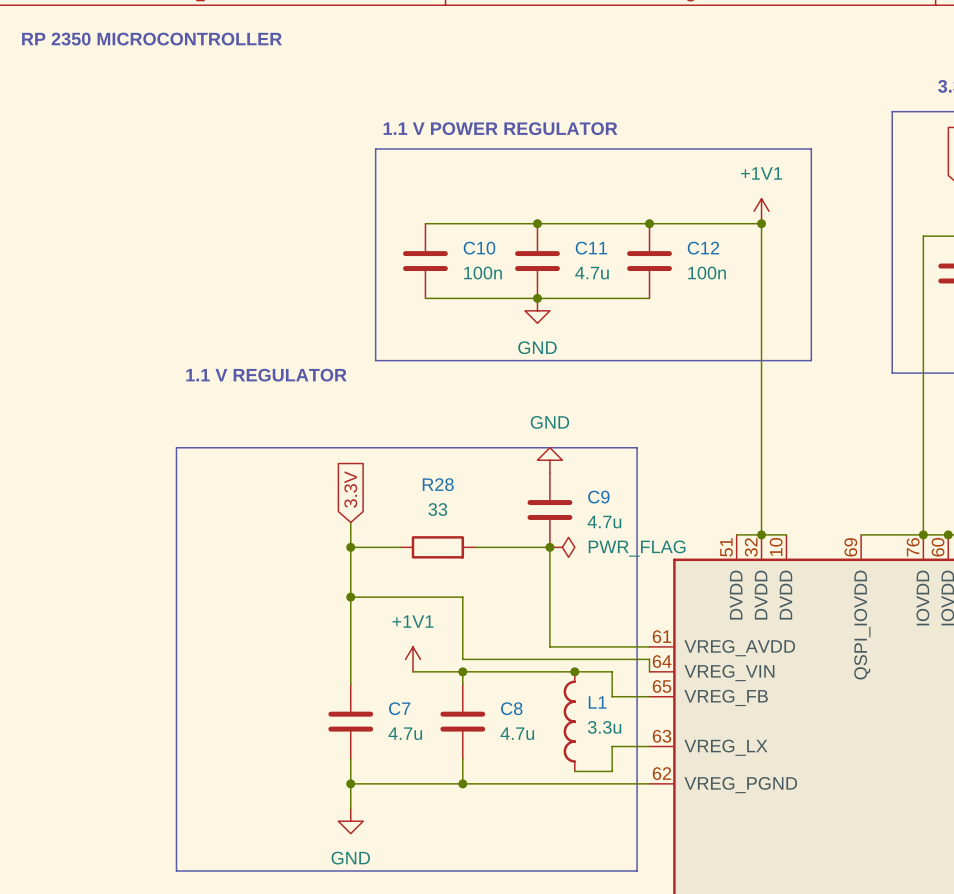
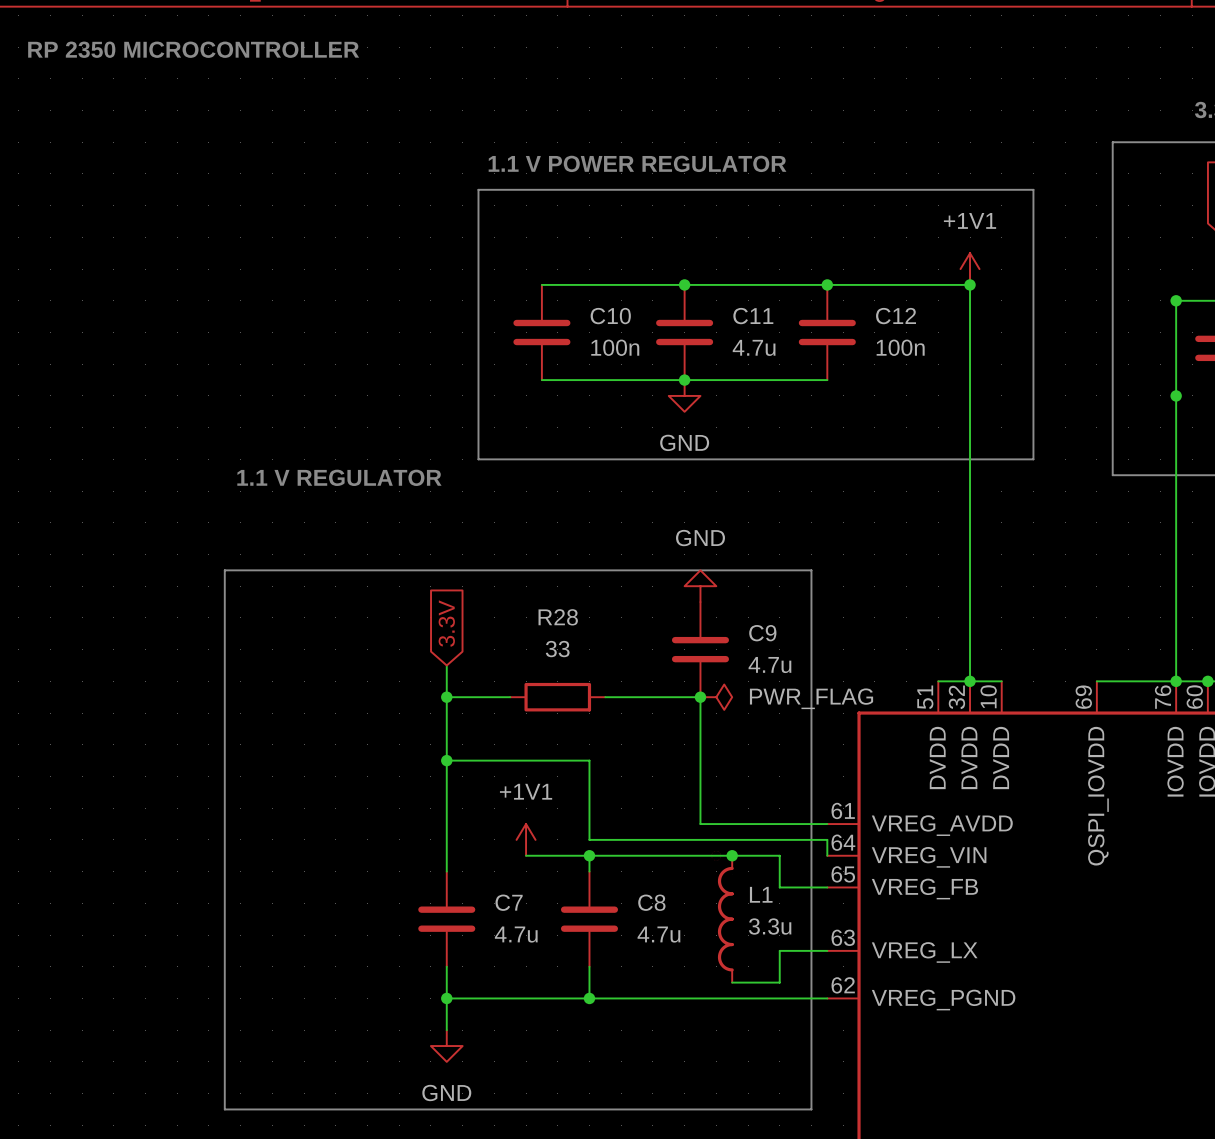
line: (892, 111) (892, 373) -> (1136, 142) (1112, 142) (1112, 475) (1136, 475)
junction: none -> (1176, 300)
junction: none -> (1176, 395)

